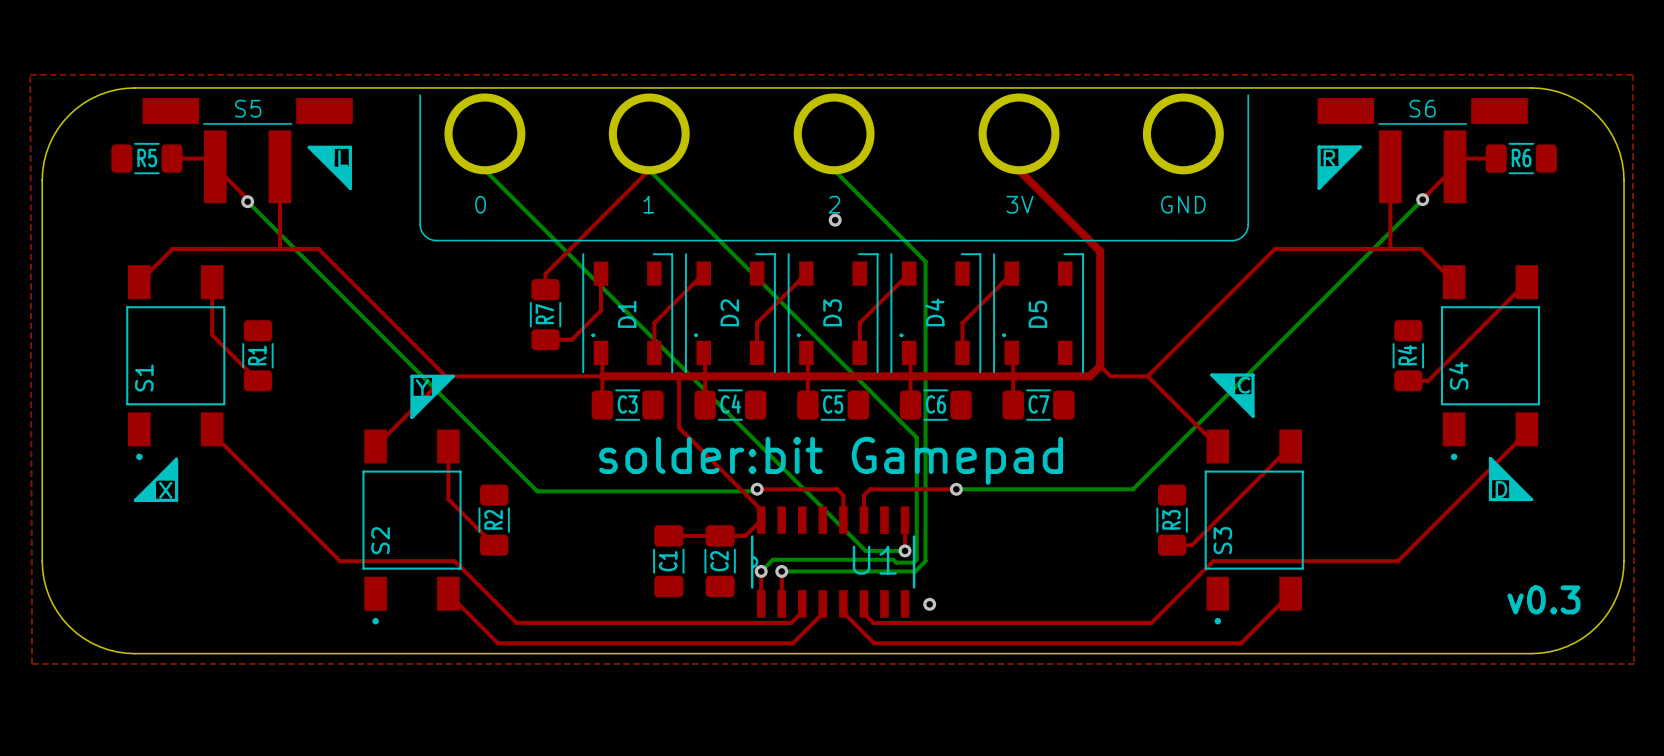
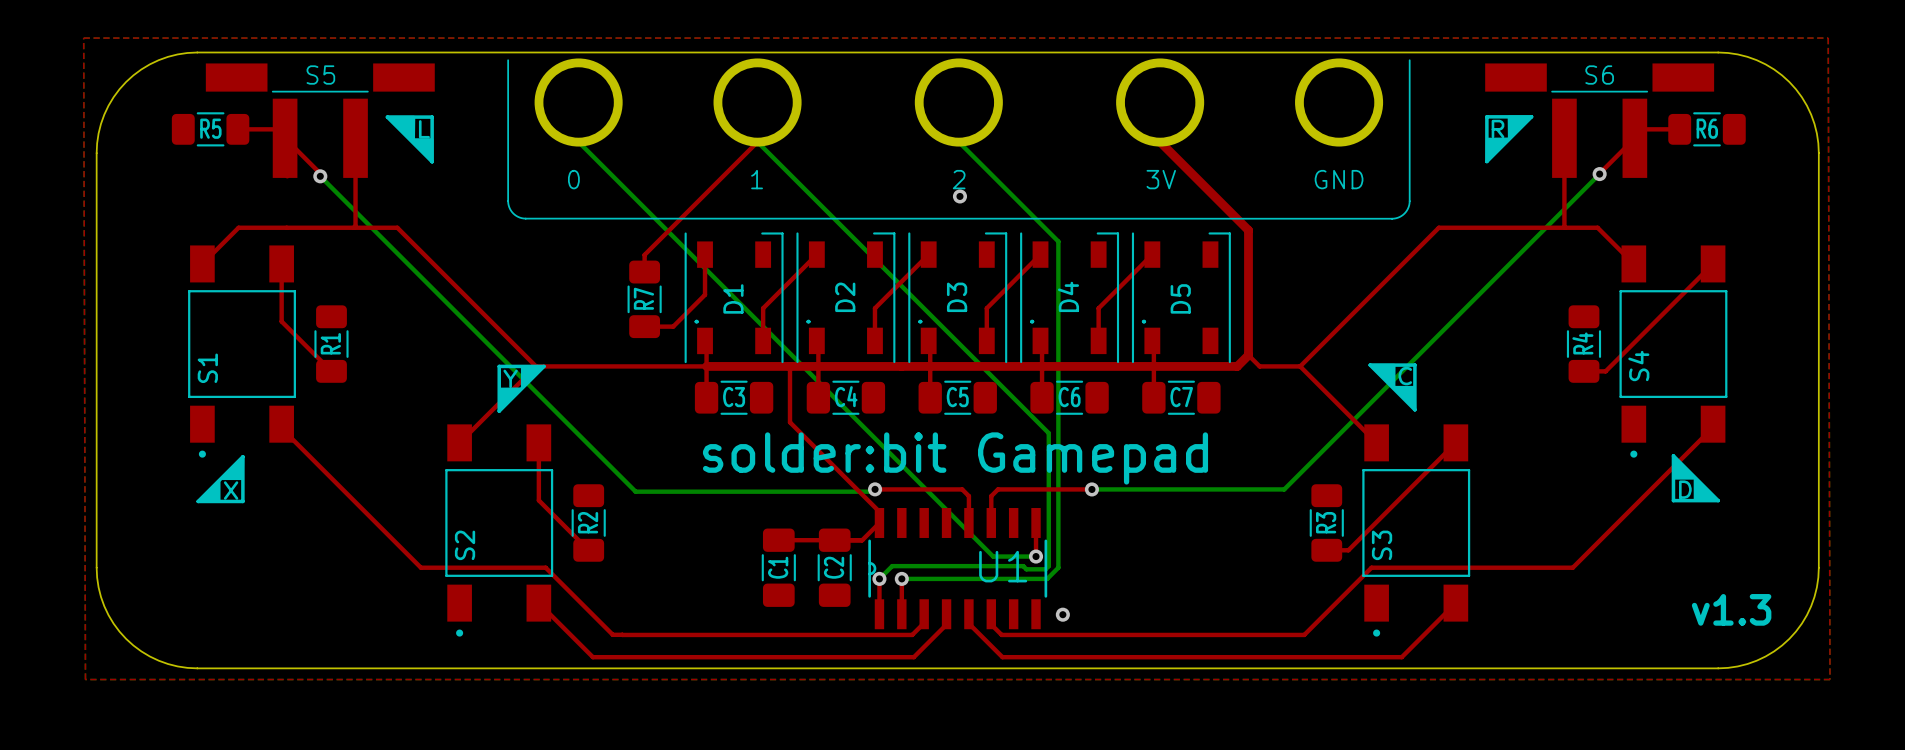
text: v0.3 (1543, 599) -> v1.3 (1731, 609)

